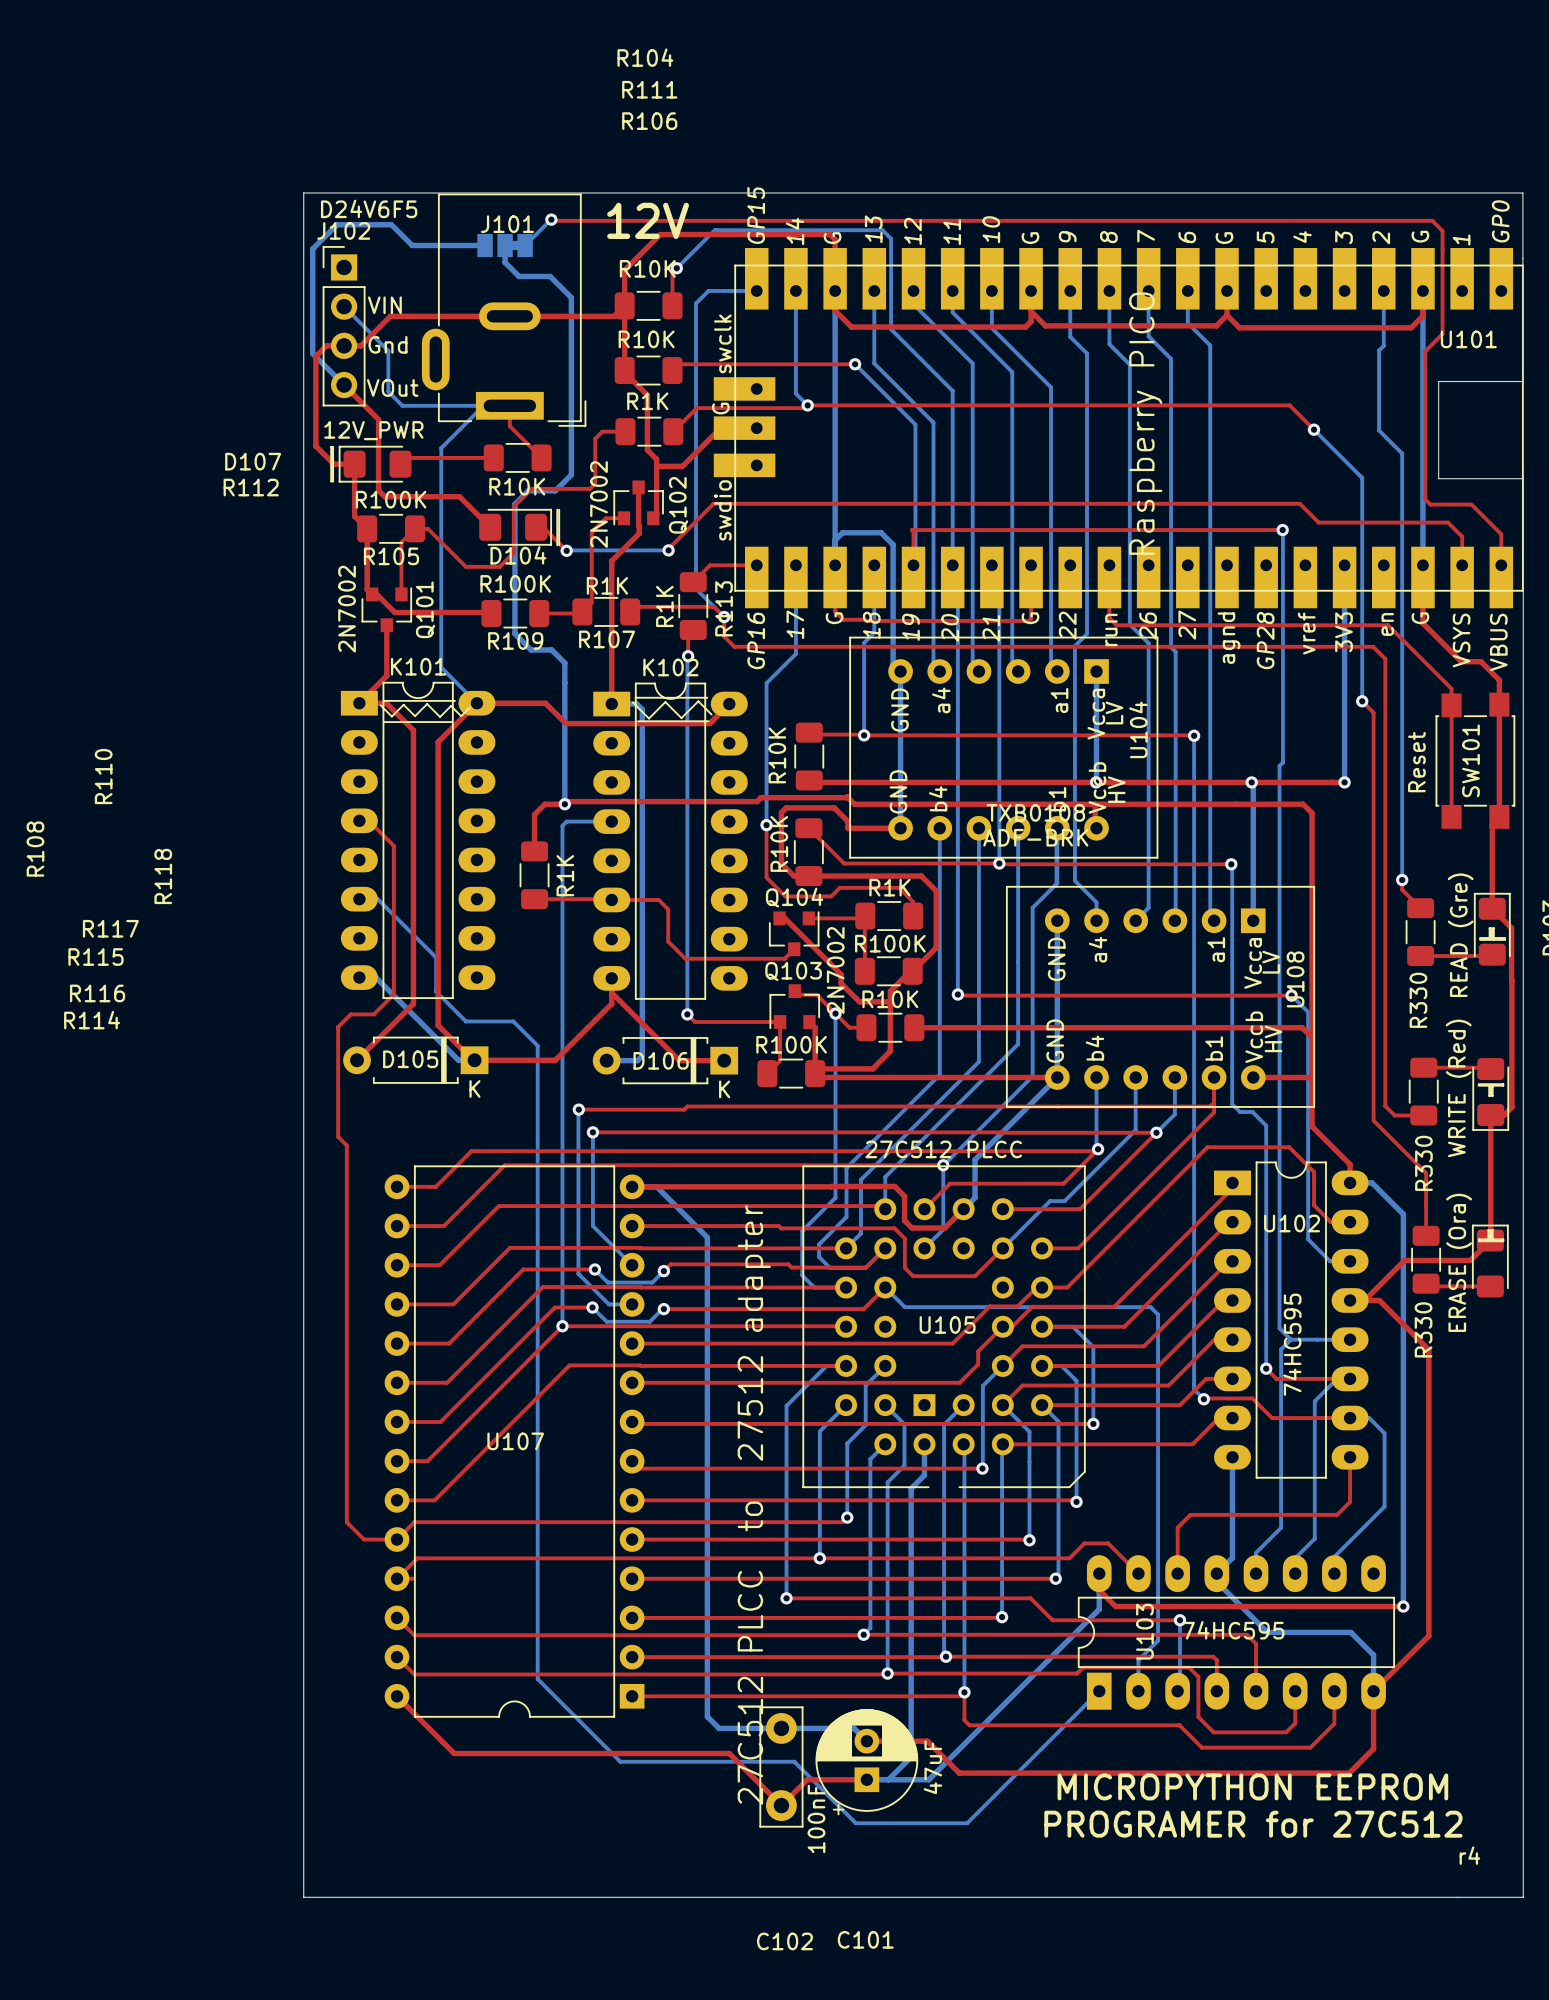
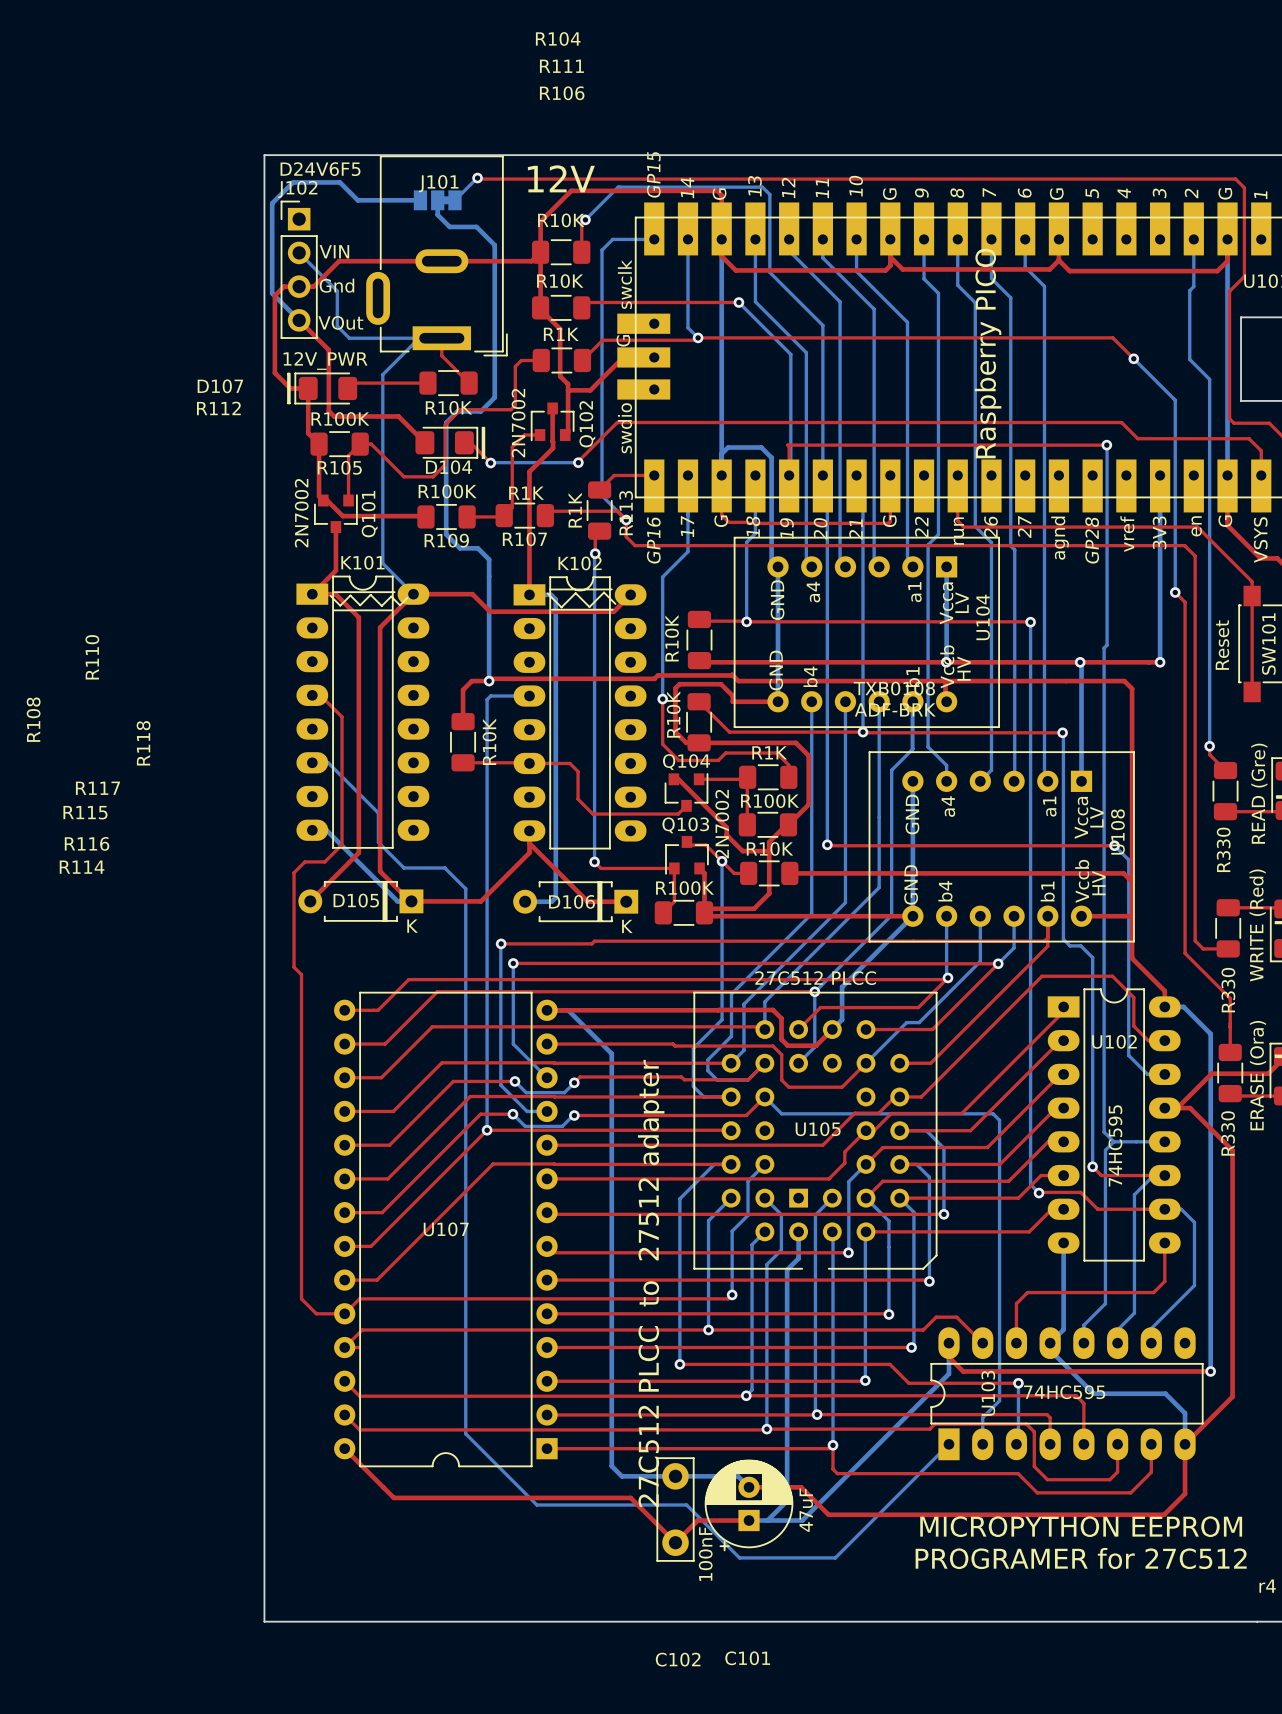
text: R1K (565, 875) -> R10K (489, 741)

